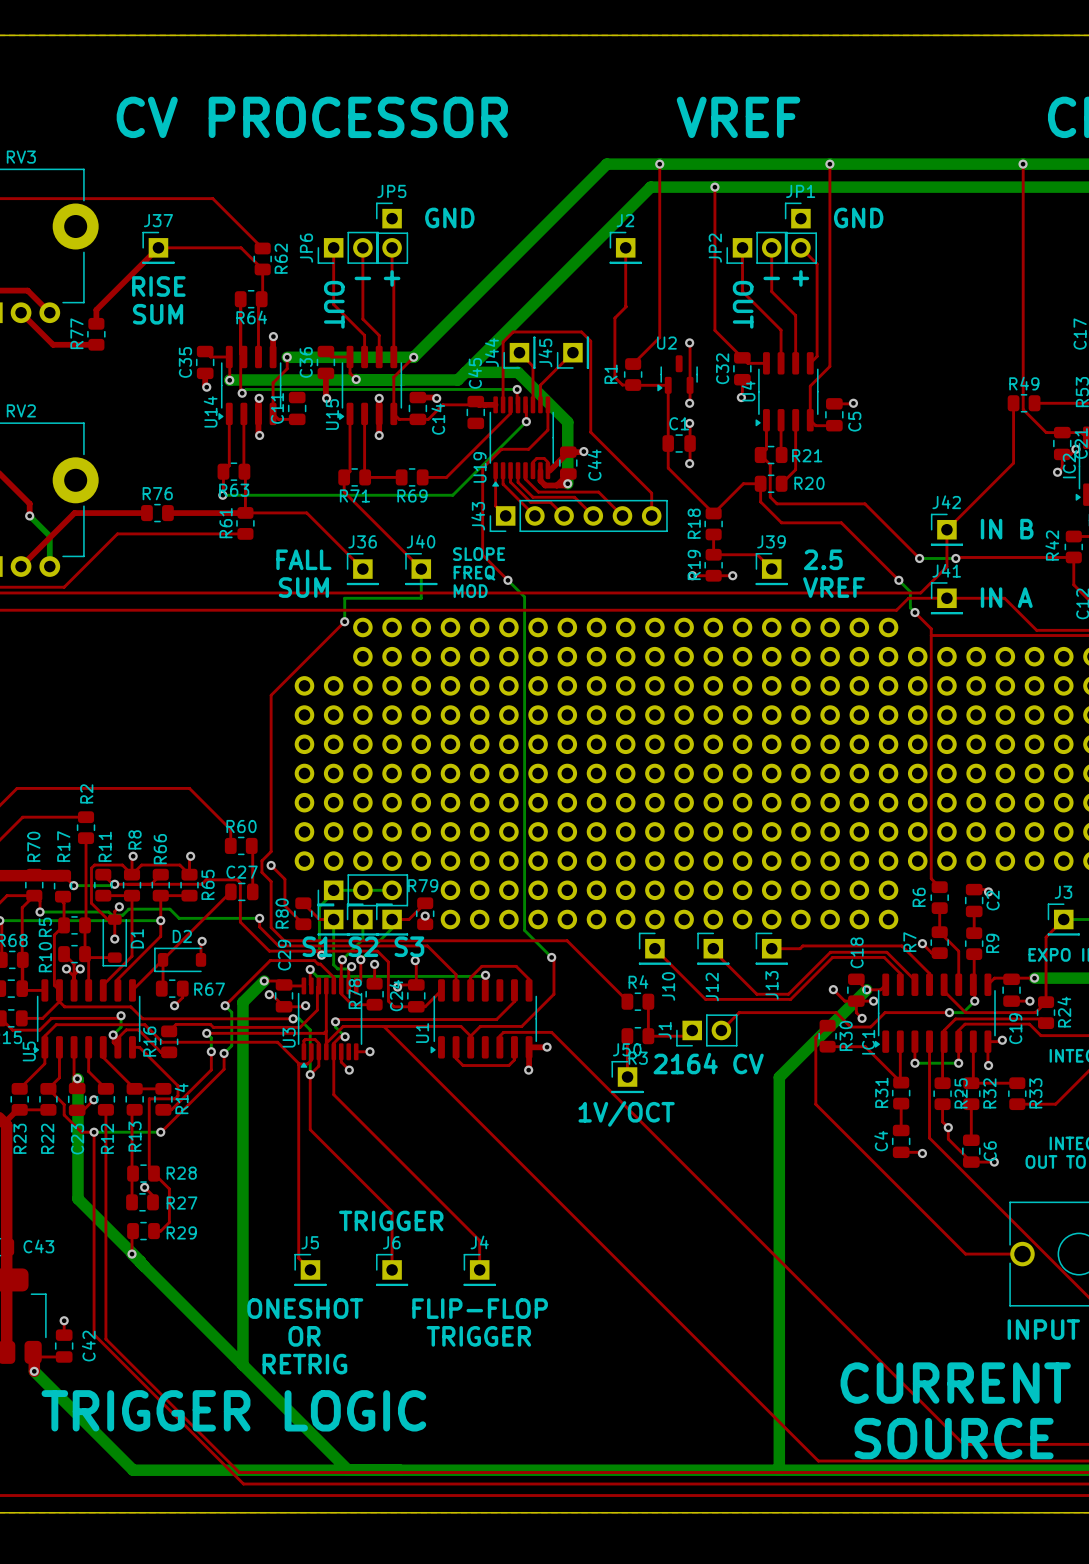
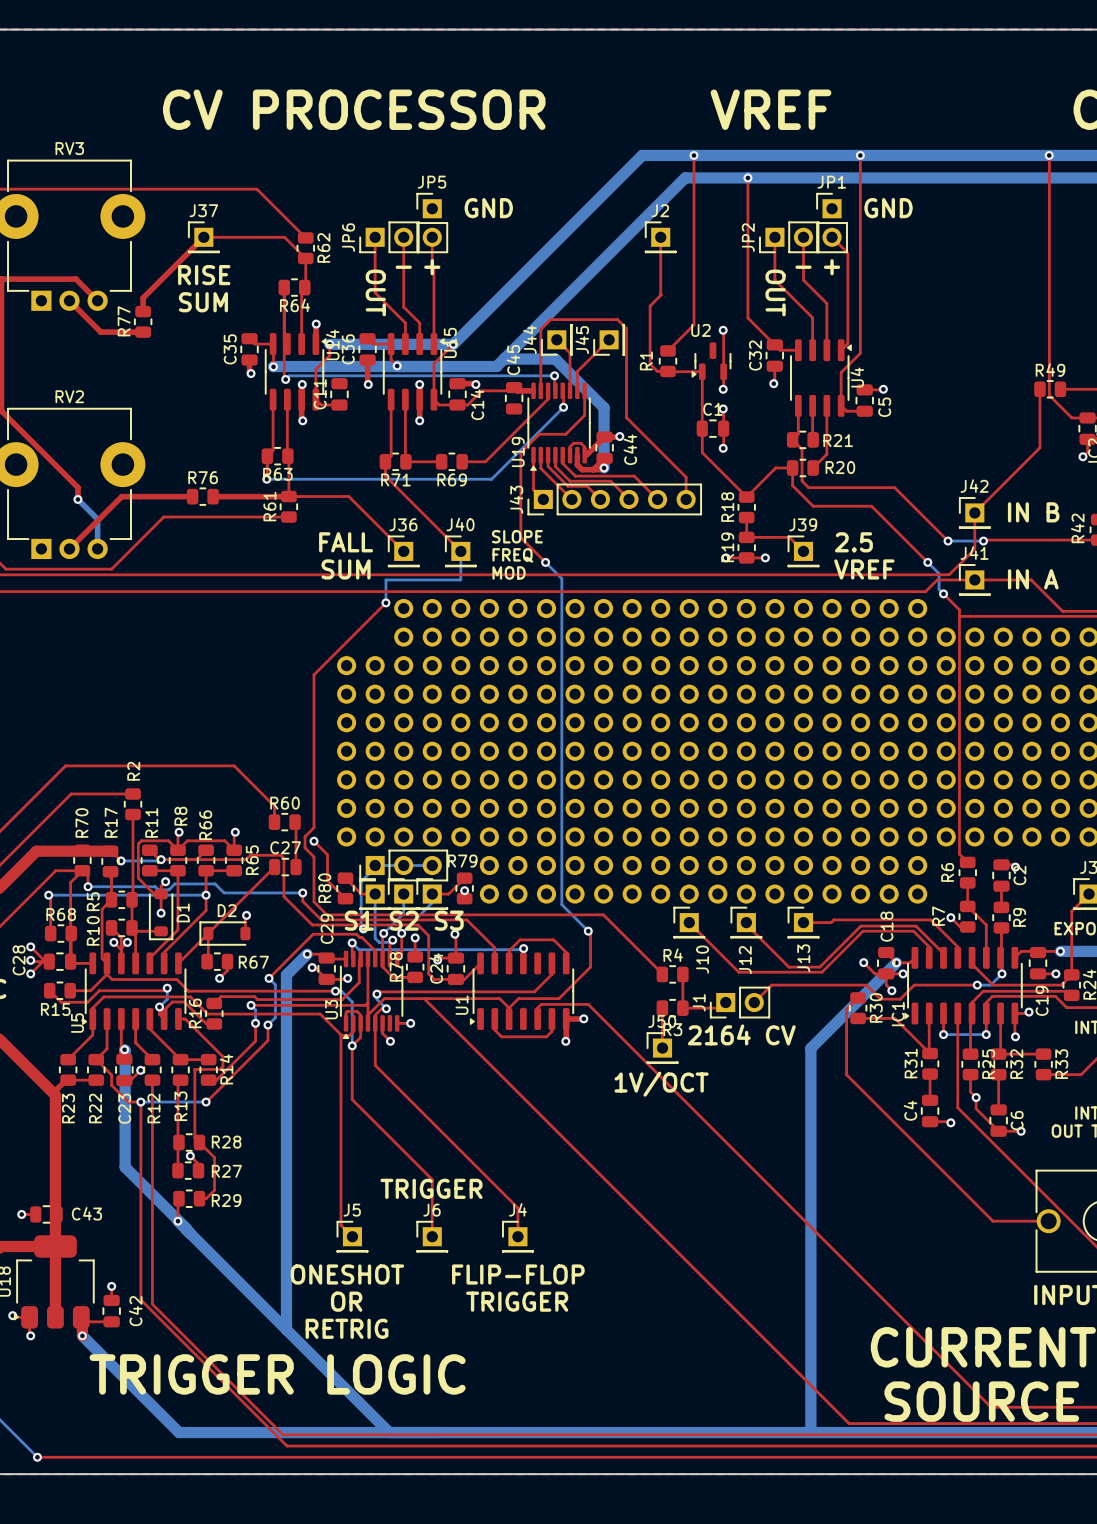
U14 rotation: 0° (249, 385) -> 180° (295, 371)
U15 rotation: 0° (370, 385) -> 180° (413, 371)
U4 rotation: 0° (787, 391) -> 180° (821, 378)

